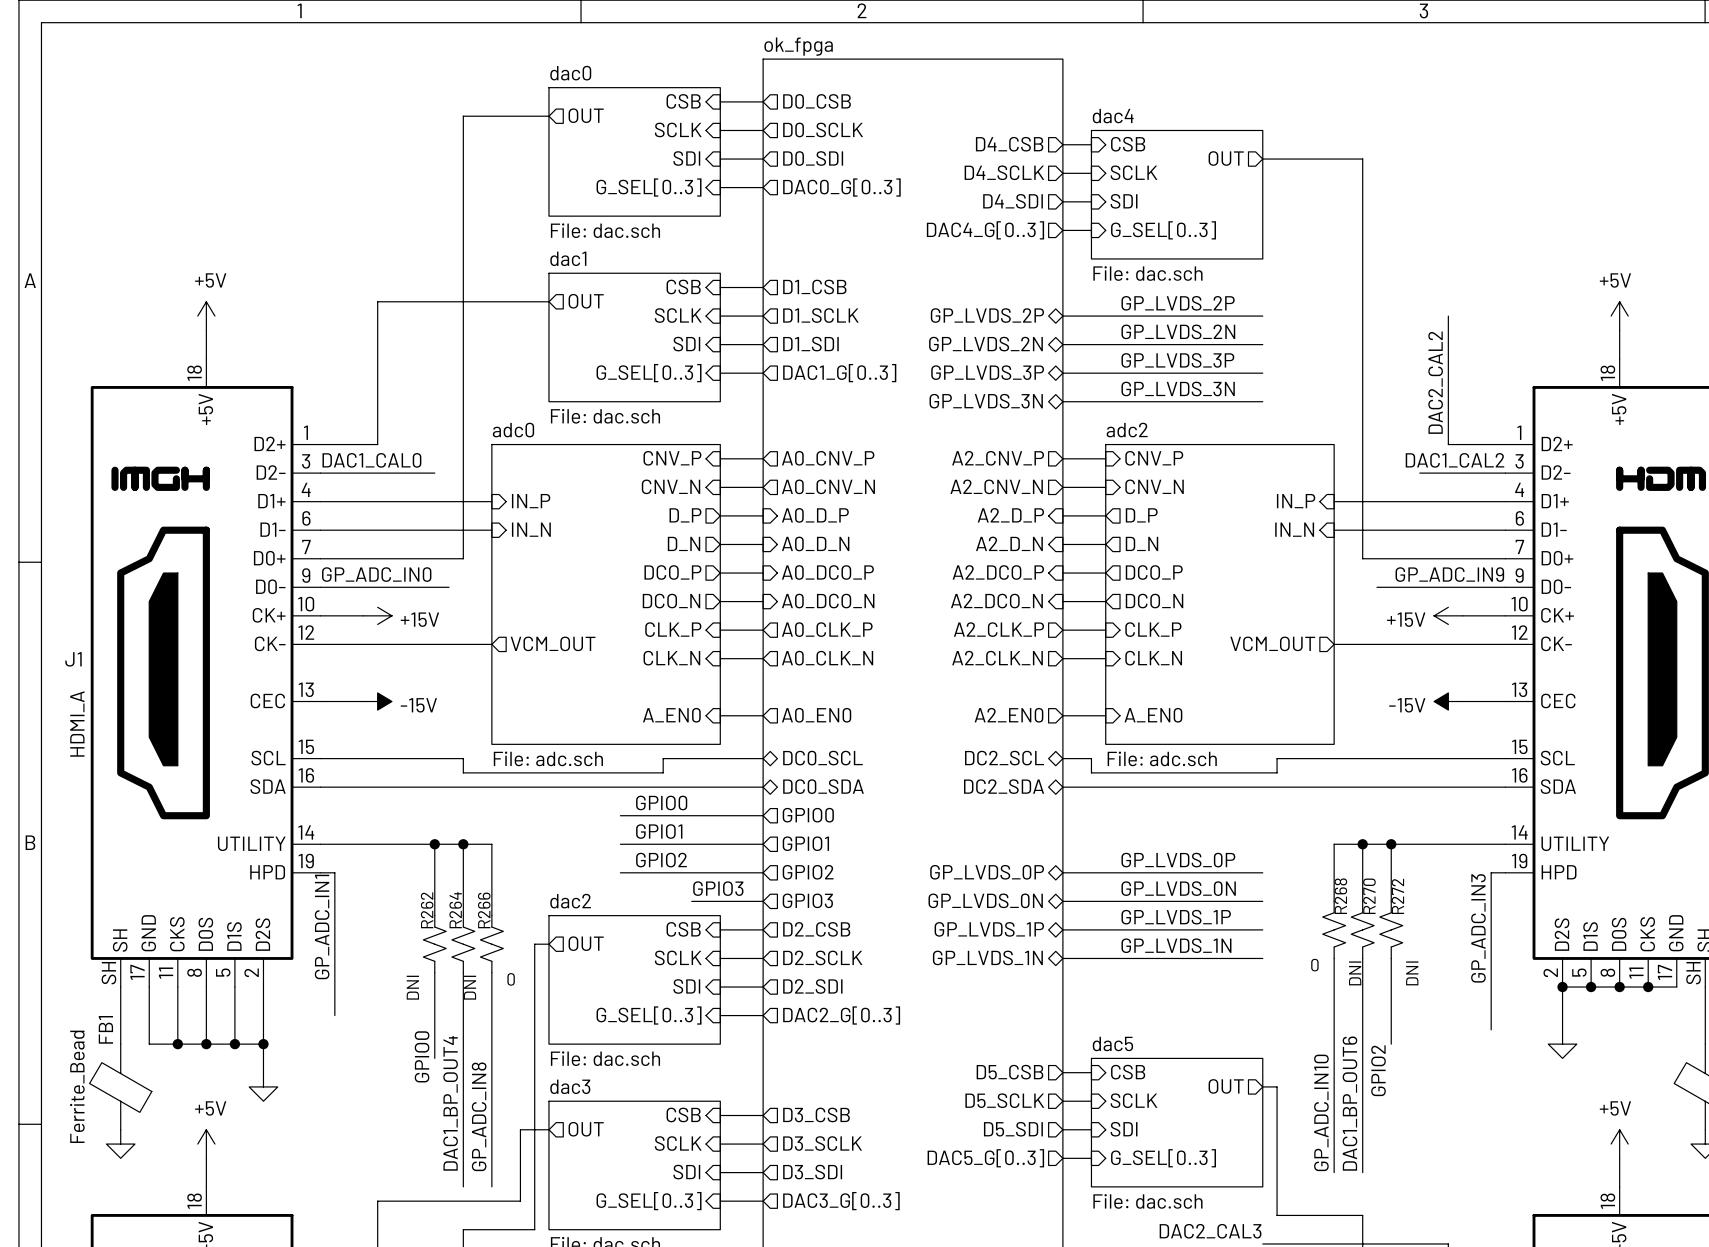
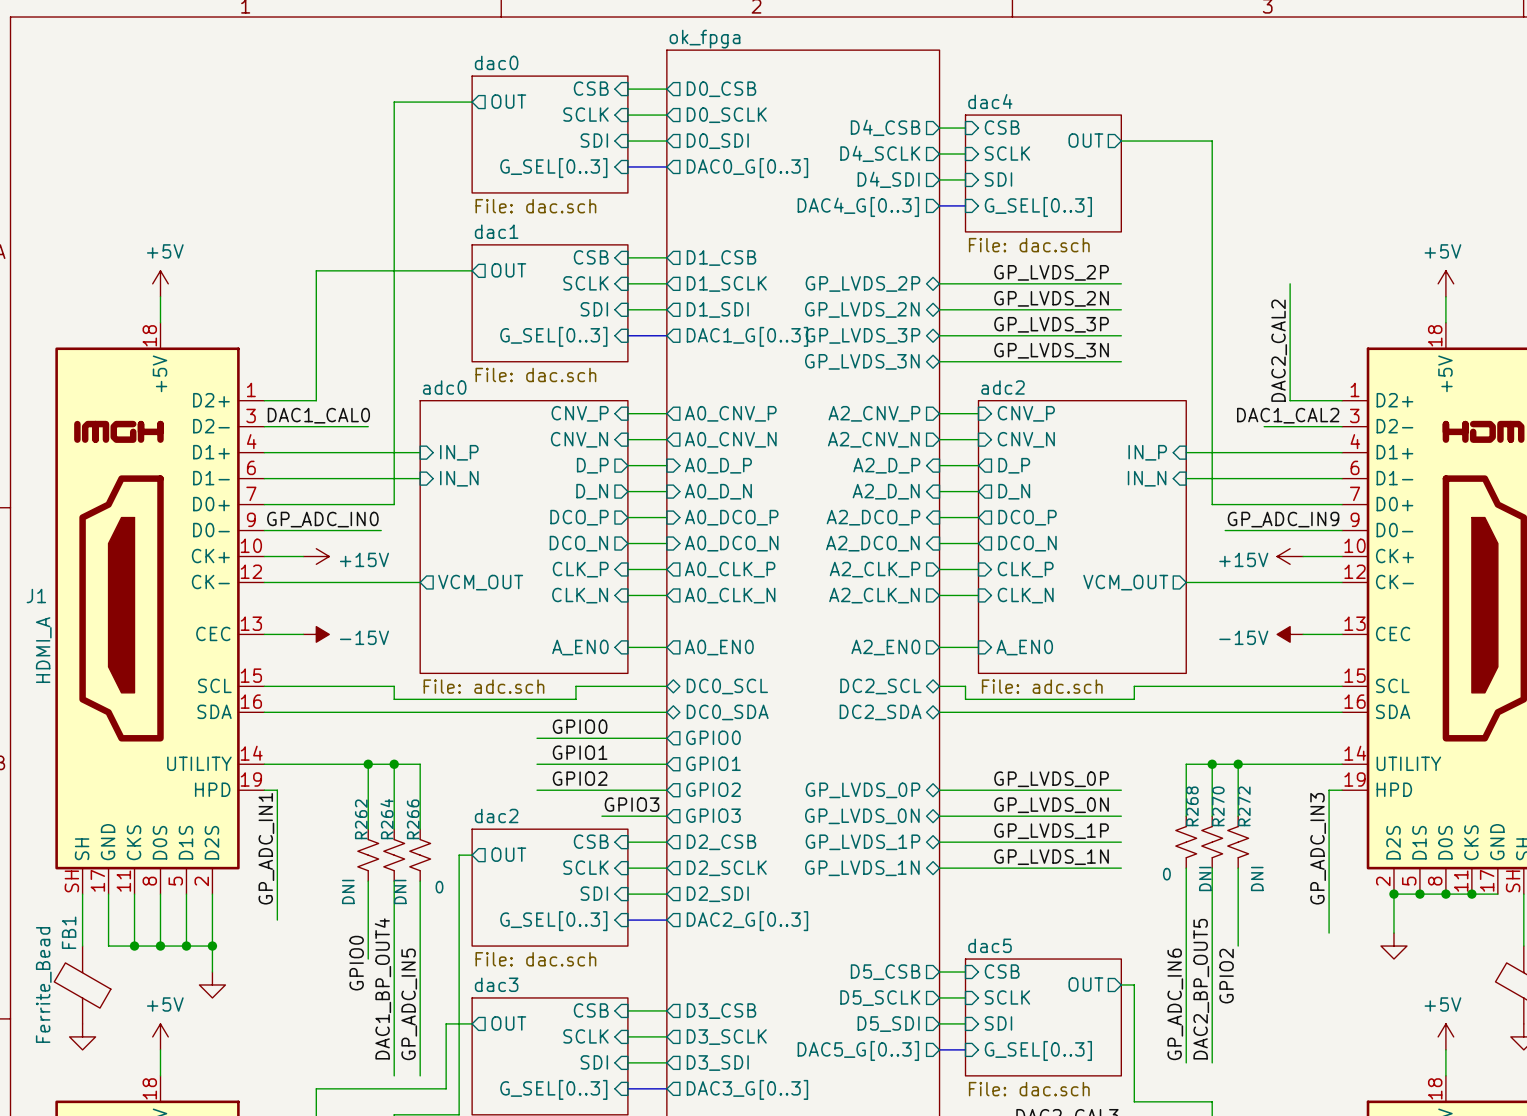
label: DAC1_BP_OUT6 (1349, 1103) -> DAC2_BP_OUT5 (1201, 989)
label: GP_ADC_IN10 (1321, 1112) -> GP_ADC_IN6 (1175, 1004)
label: GP_ADC_IN8 (479, 1116) -> GP_ADC_IN5 (409, 1004)

